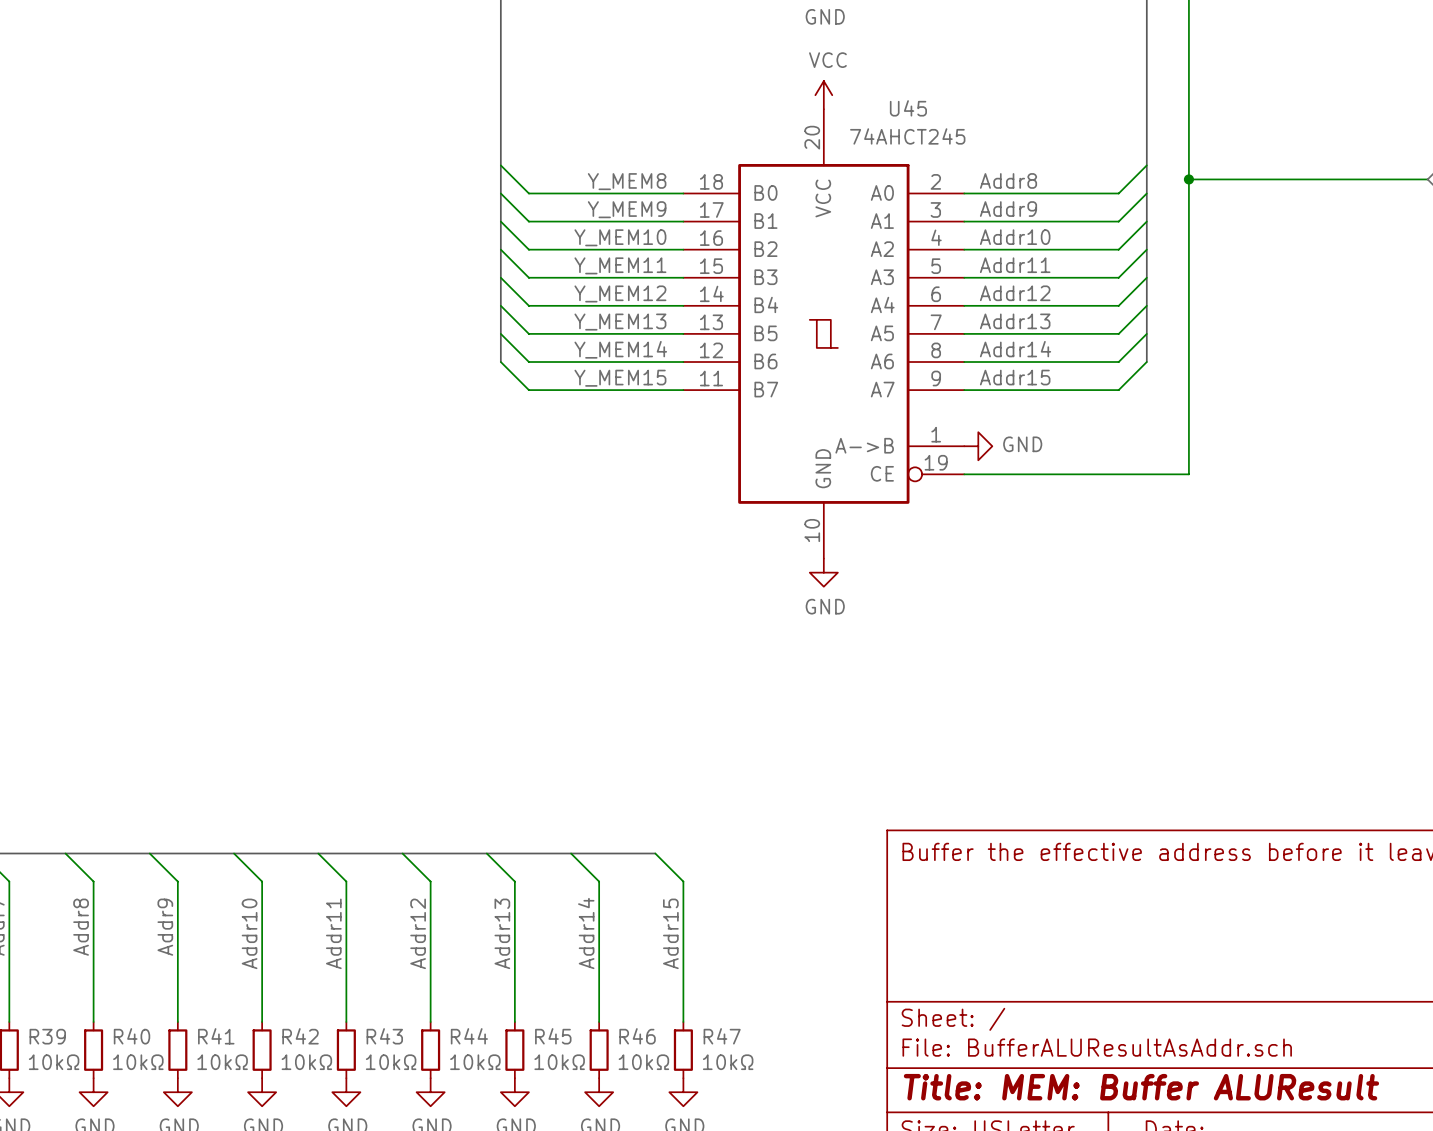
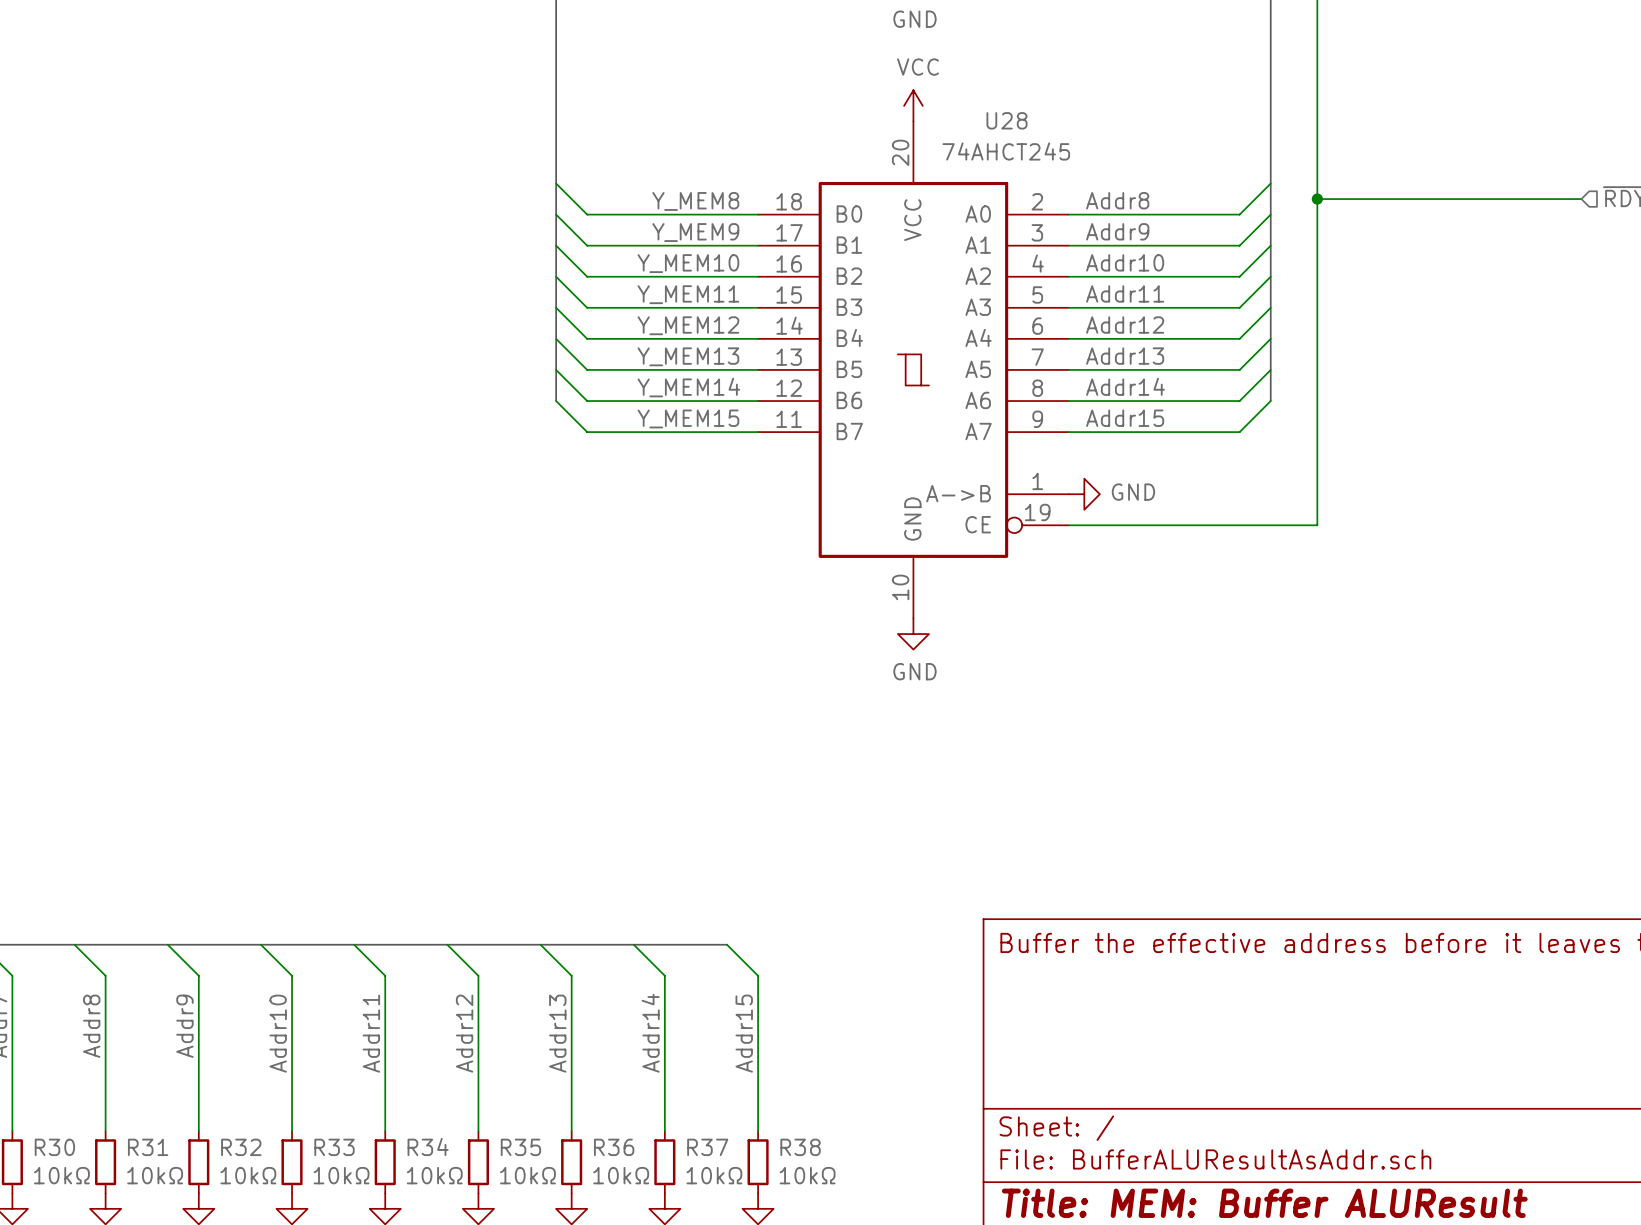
U45 name: U45 (908, 108) -> U28 (1007, 120)
R39 name: R39 (47, 1036) -> R30 (54, 1147)
R40 name: R40 (132, 1036) -> R31 (148, 1147)
R41 name: R41 (216, 1036) -> R32 (241, 1147)
R42 name: R42 (300, 1036) -> R33 (334, 1147)
R43 name: R43 (384, 1036) -> R34 (428, 1146)
R44 name: R44 (469, 1036) -> R35 (520, 1147)
R45 name: R45 (553, 1036) -> R36 (614, 1147)
R46 name: R46 (637, 1036) -> R37 (707, 1147)
R47 name: R47 (722, 1036) -> R38 (800, 1147)

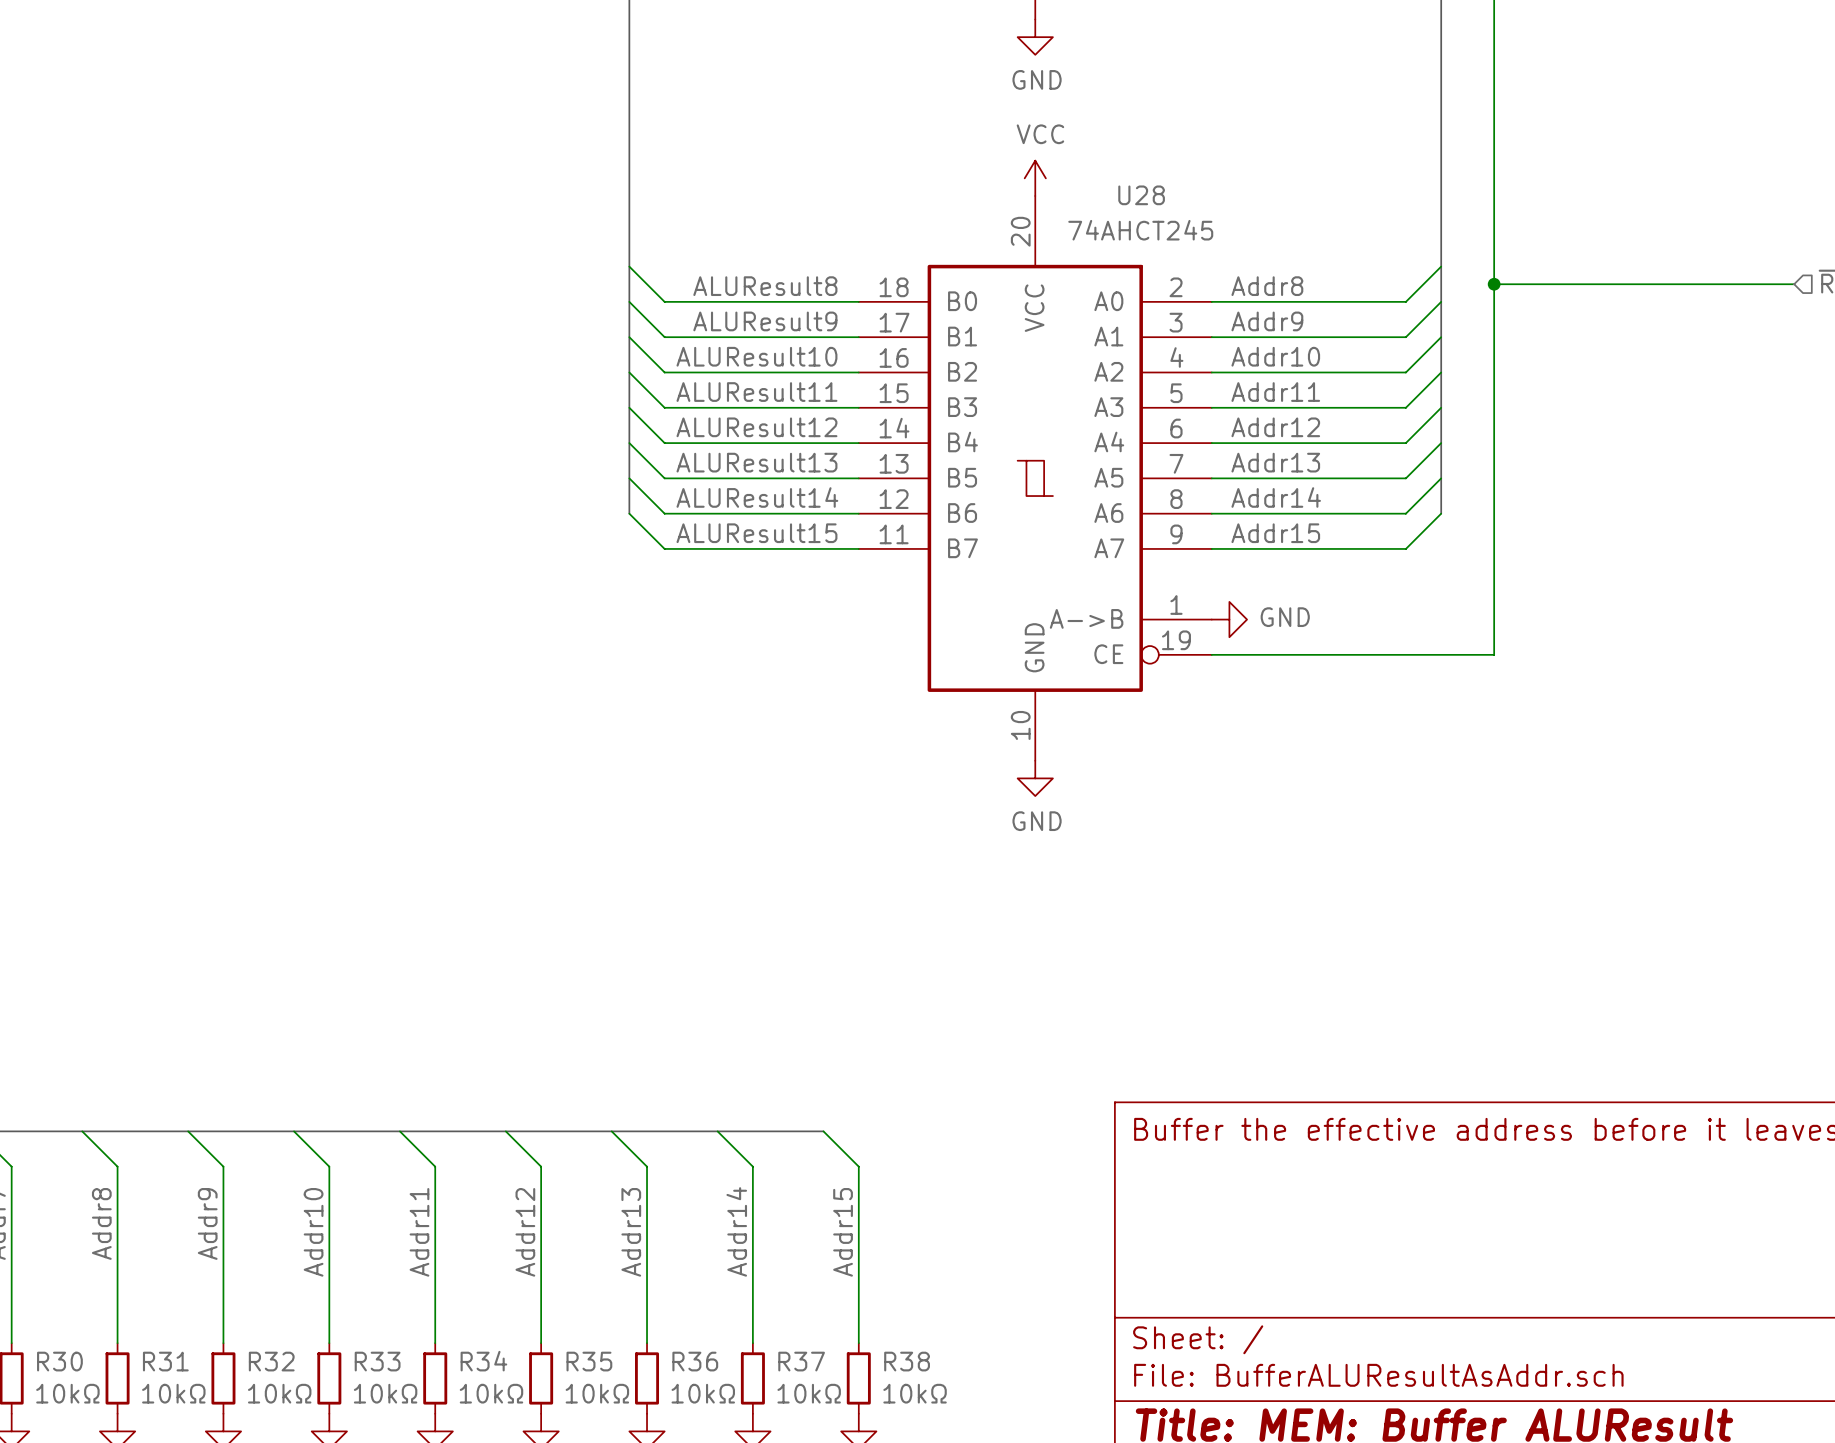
label: Y_MEM8 (695, 201) -> ALUResult8 (765, 286)
label: Y_MEM9 (695, 232) -> ALUResult9 (765, 321)
label: Y_MEM10 (688, 263) -> ALUResult10 (756, 356)
label: Y_MEM11 (688, 294) -> ALUResult11 (756, 392)
label: Y_MEM12 (688, 325) -> ALUResult12 (756, 427)
label: Y_MEM13 (688, 356) -> ALUResult13 (756, 462)
label: Y_MEM14 (688, 387) -> ALUResult14 (757, 497)
label: Y_MEM15 (688, 418) -> ALUResult15 (756, 533)

